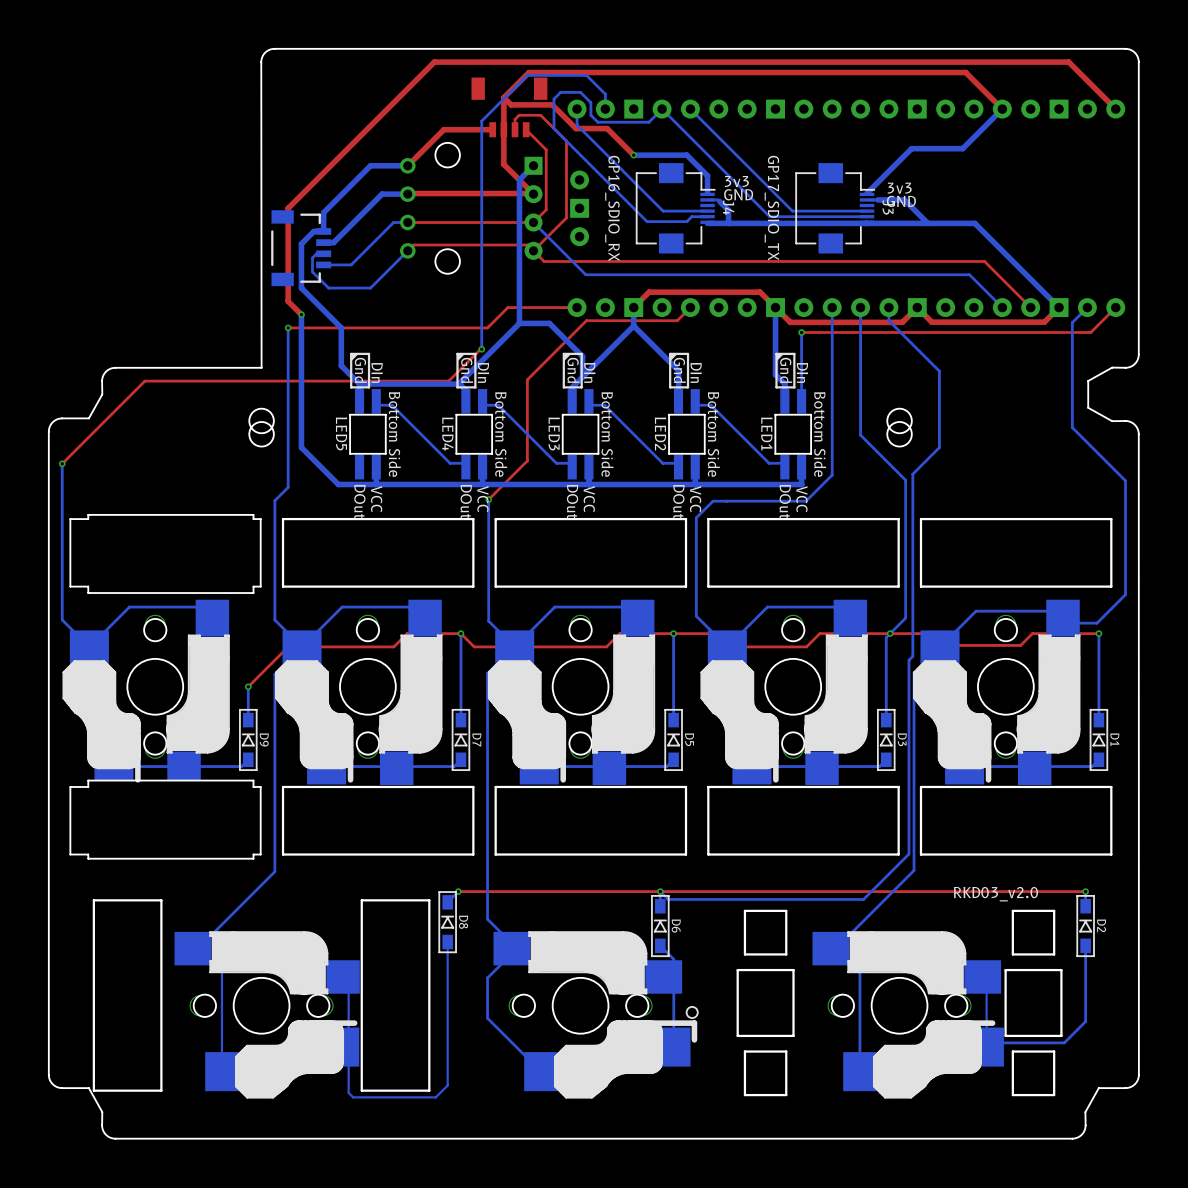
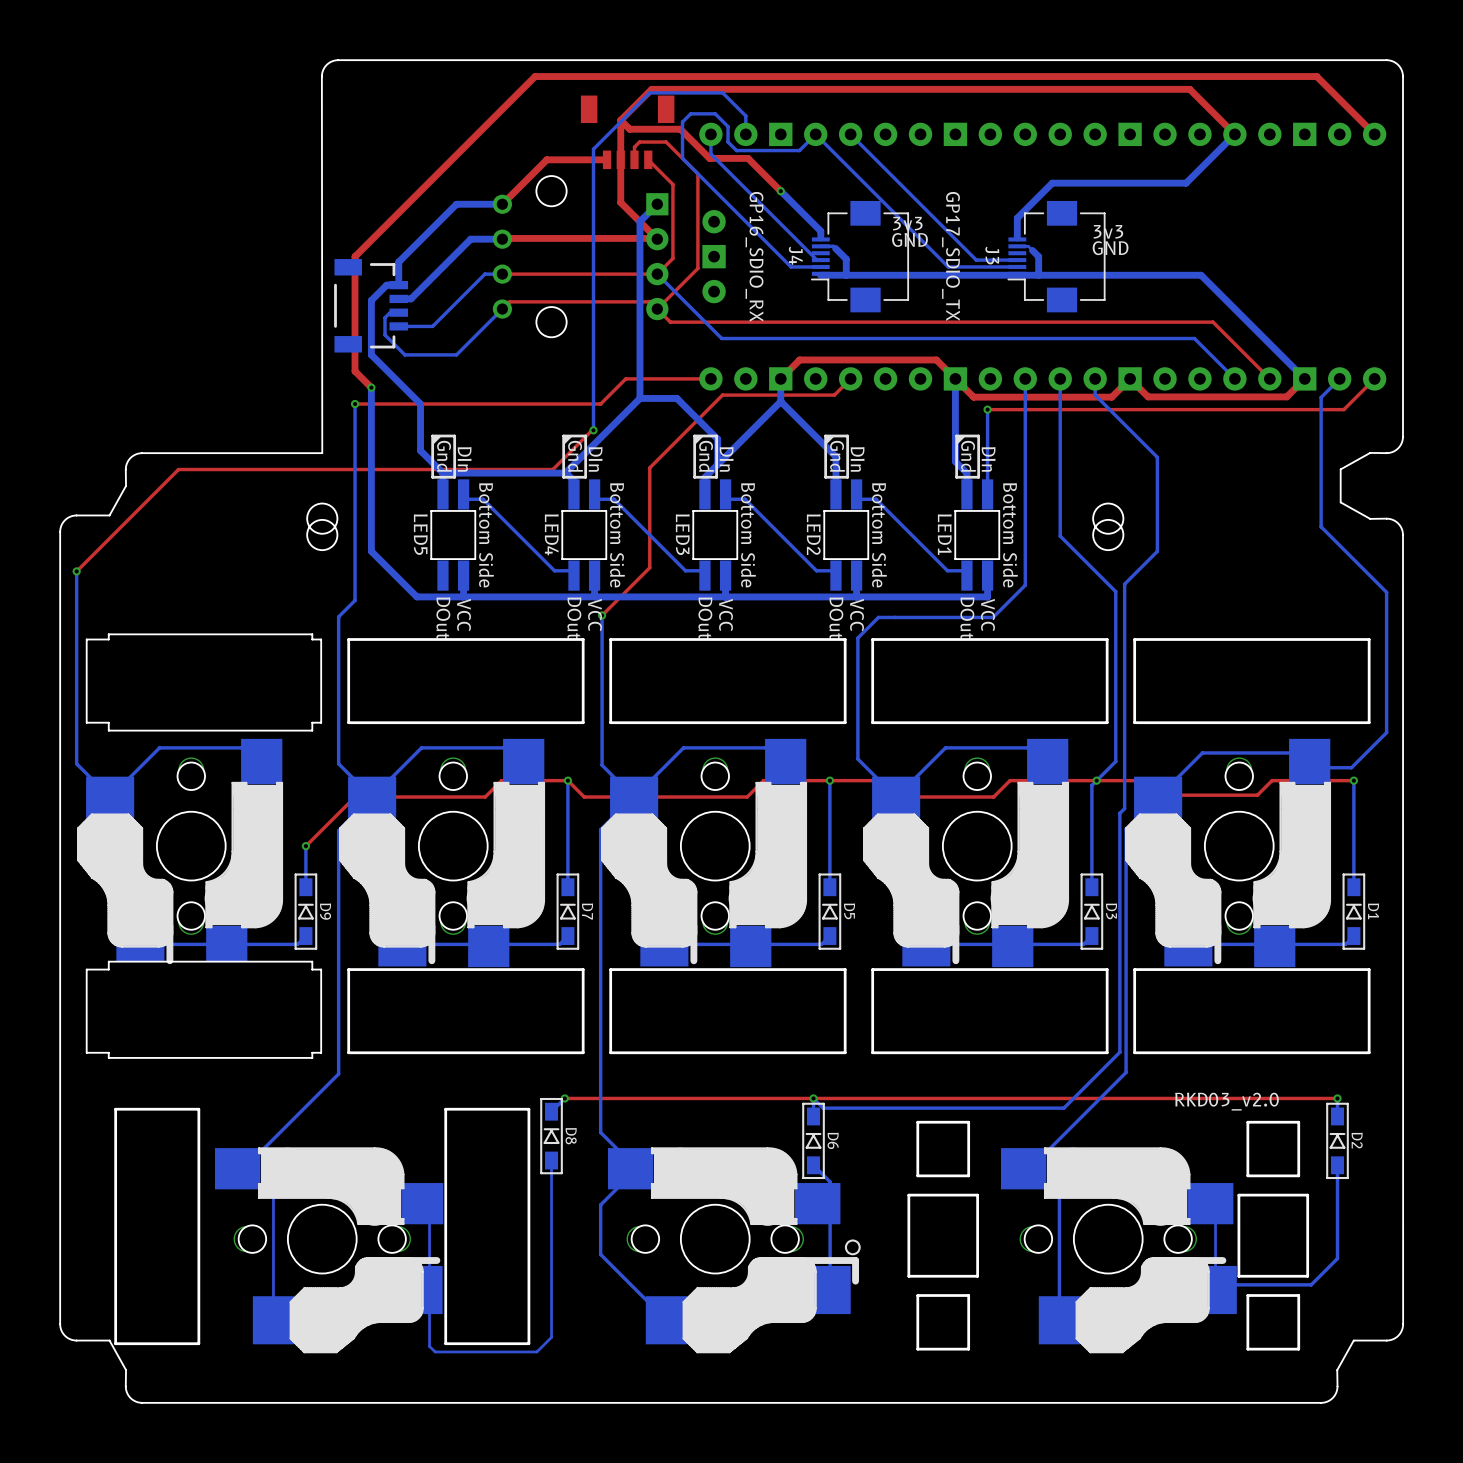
bottom track: (911, 148) (867, 193) -> (1123, 183) (1052, 183) (1017, 218) (1017, 238)
bottom track: (633, 155) (686, 155) (707, 175) (707, 193) -> (780, 191) (820, 231) (820, 238)
bottom track: (707, 199) (718, 199) (728, 210) (728, 223) -> (820, 246) (833, 246) (846, 259) (846, 275)
bottom track: none -> (1017, 246) (1028, 246) (1038, 256) (1038, 275)
bottom track: (867, 199) (904, 199) (927, 223) -> none
J4 rotation: 0° (675, 208) -> 180° (860, 256)
J3 rotation: 0° (835, 208) -> 180° (1056, 256)
bottom track: (707, 211) (666, 211) -> none
bottom track: (867, 211) (825, 211) -> none
bottom track: (707, 216) (691, 216) (686, 221) (647, 221) (642, 216) -> (820, 266) (791, 266)
bottom track: (867, 216) (825, 216) -> none
bottom track: none -> (871, 275) (820, 275)

